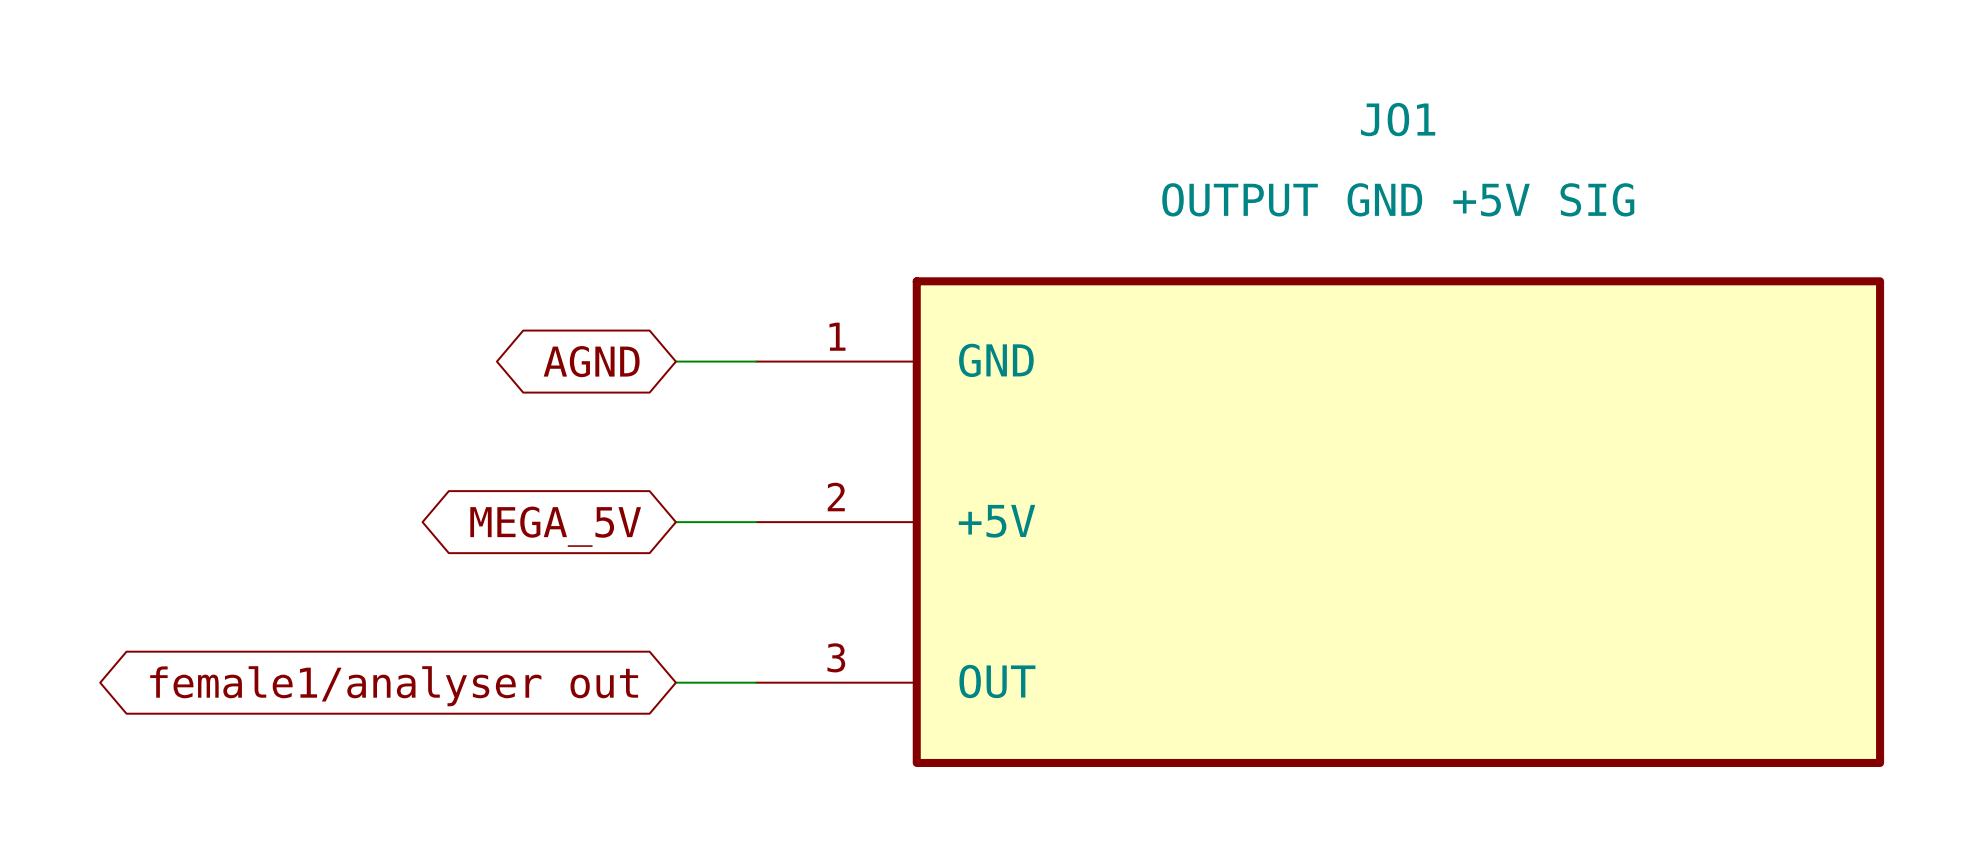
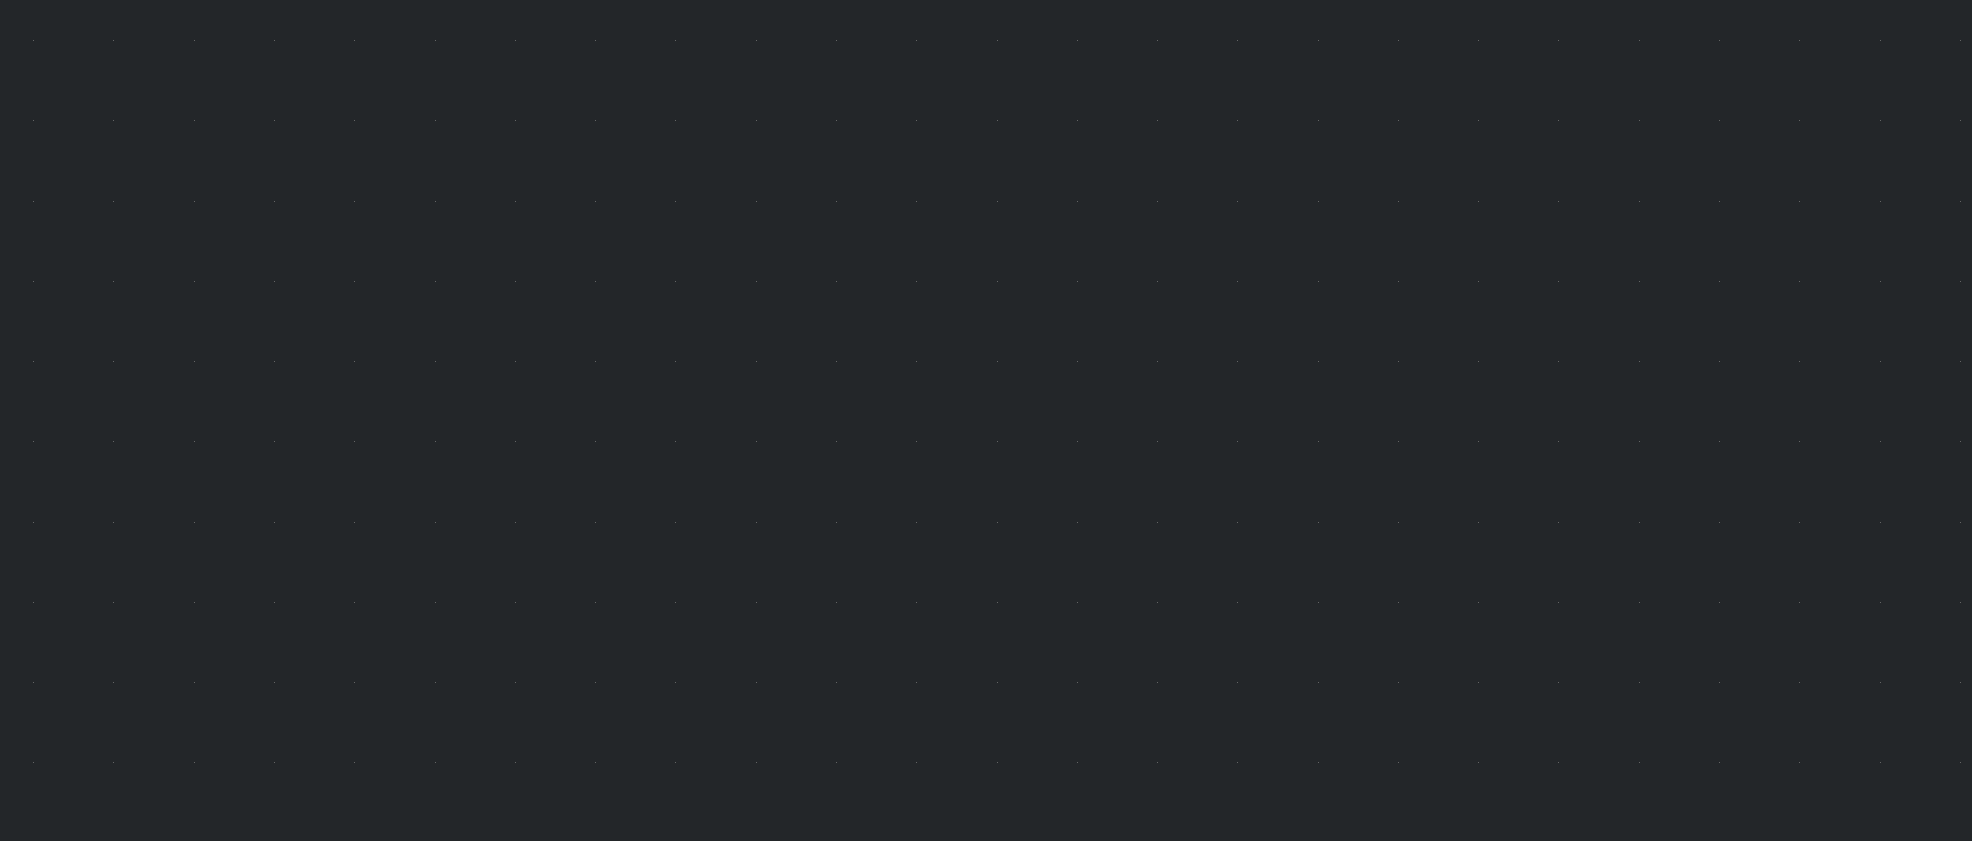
global label: AGND (591, 361) -> none
wire: (675, 361) (756, 361) -> none
wire: (675, 522) (756, 522) -> none
JO1: OUTPUT GND +5V SIG (1320, 522) -> none
global label: MEGA_5V (555, 526) -> none
wire: (675, 682) (756, 682) -> none
global label: female1/analyser out (394, 686) -> none

